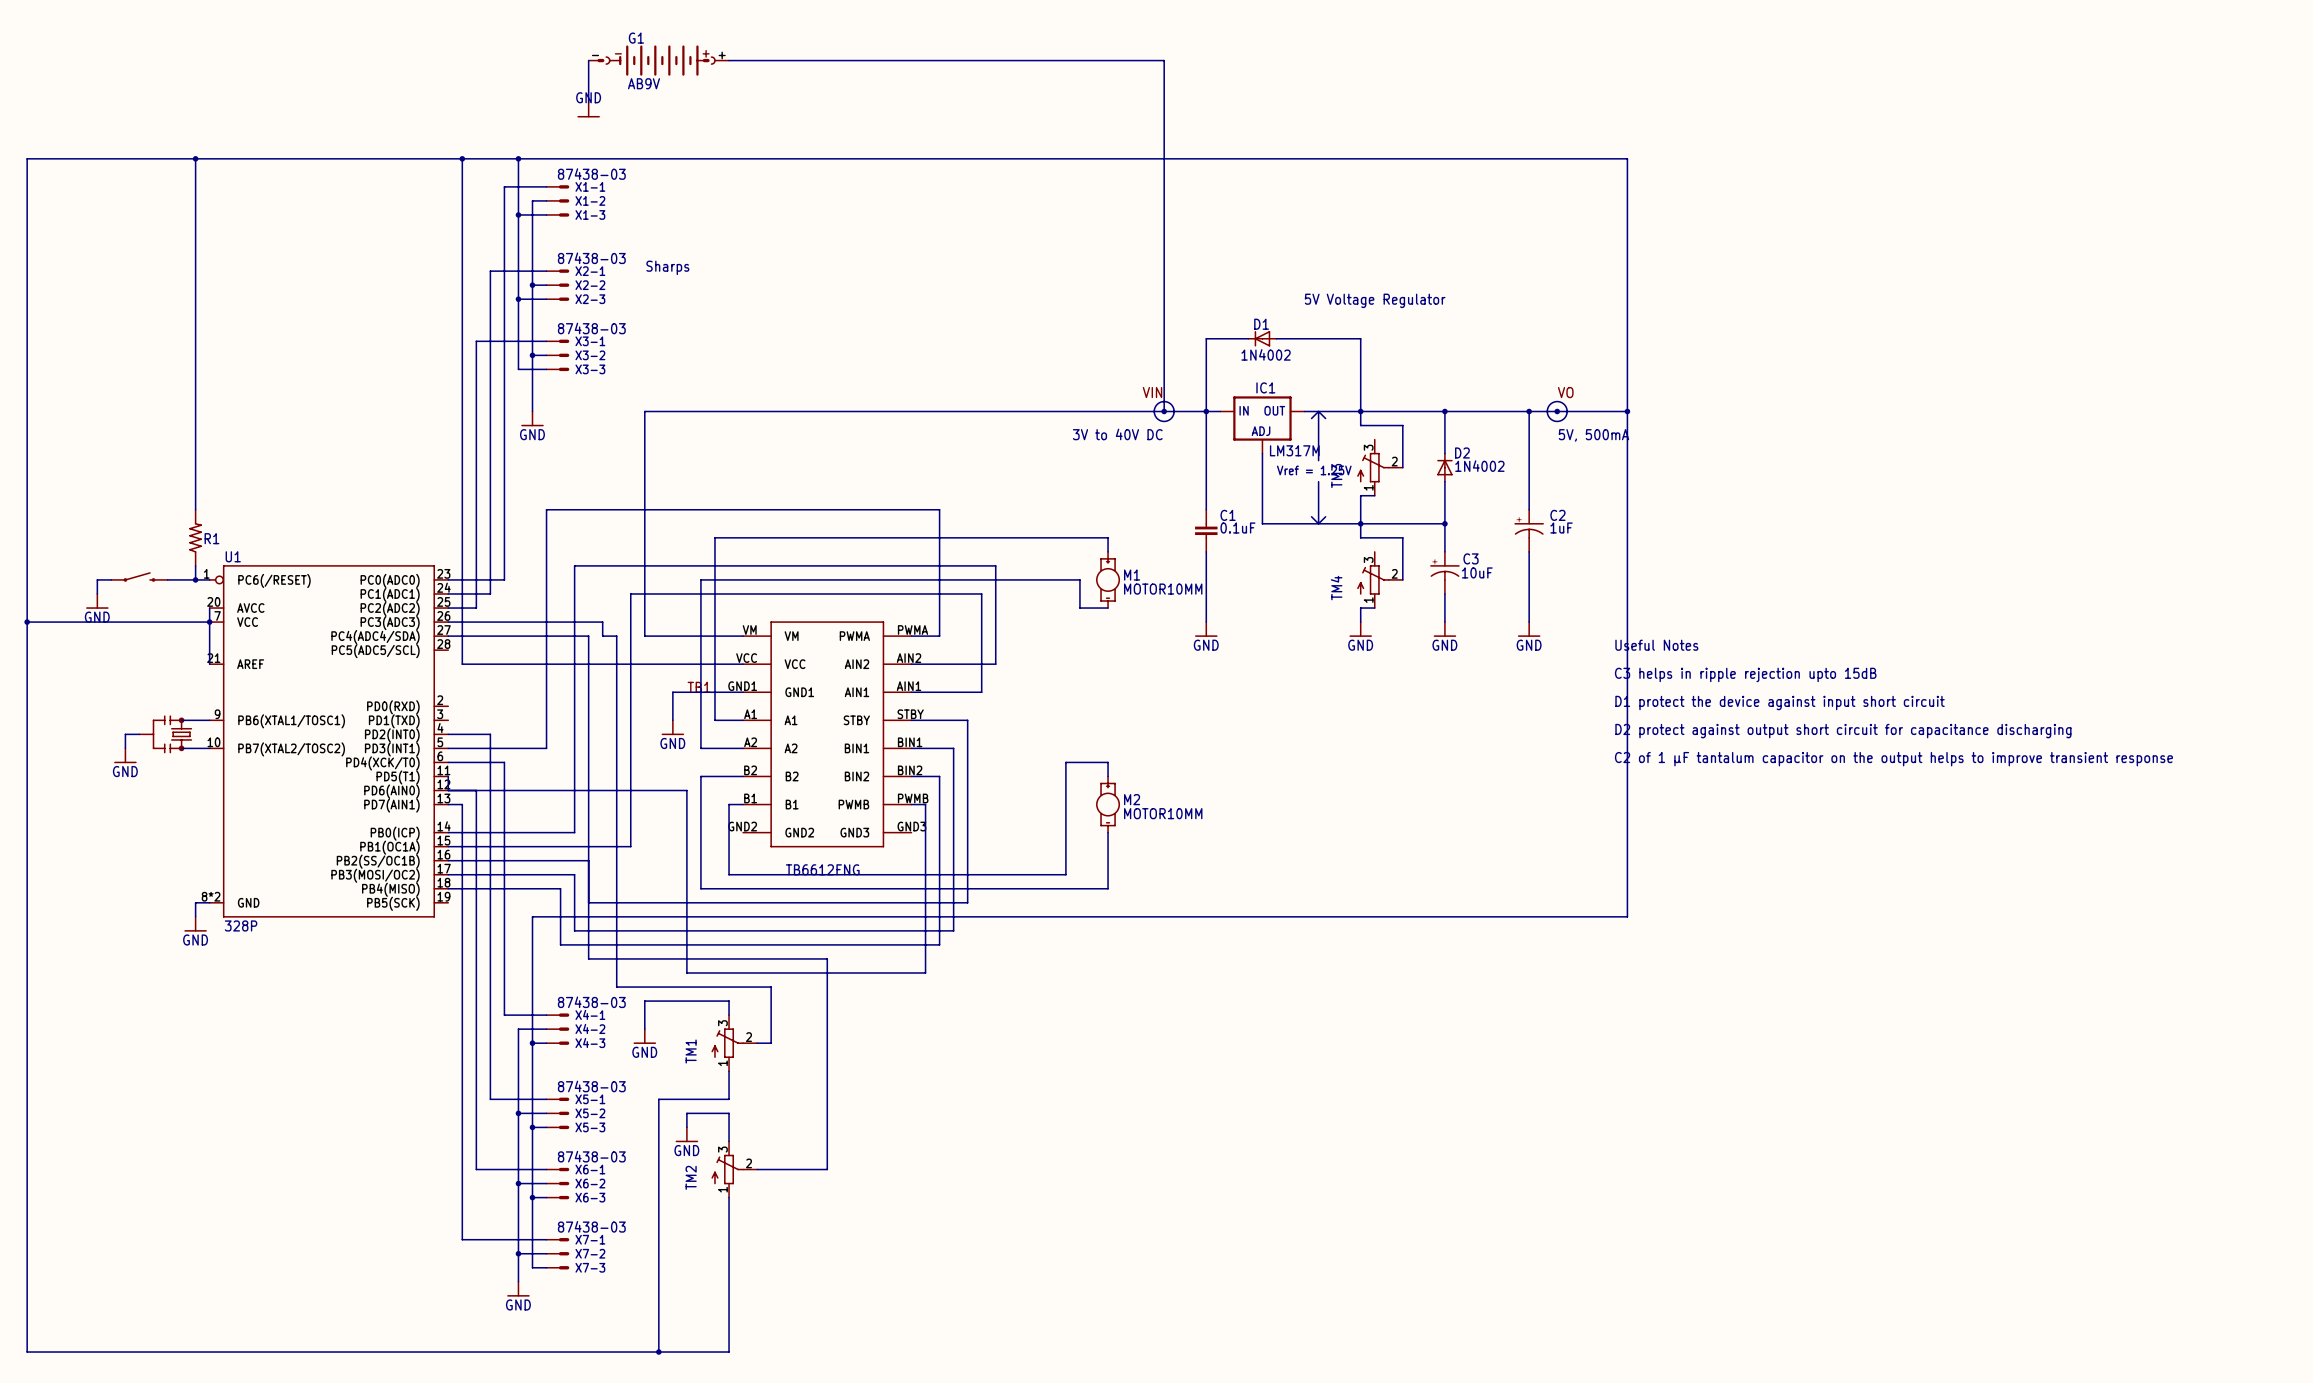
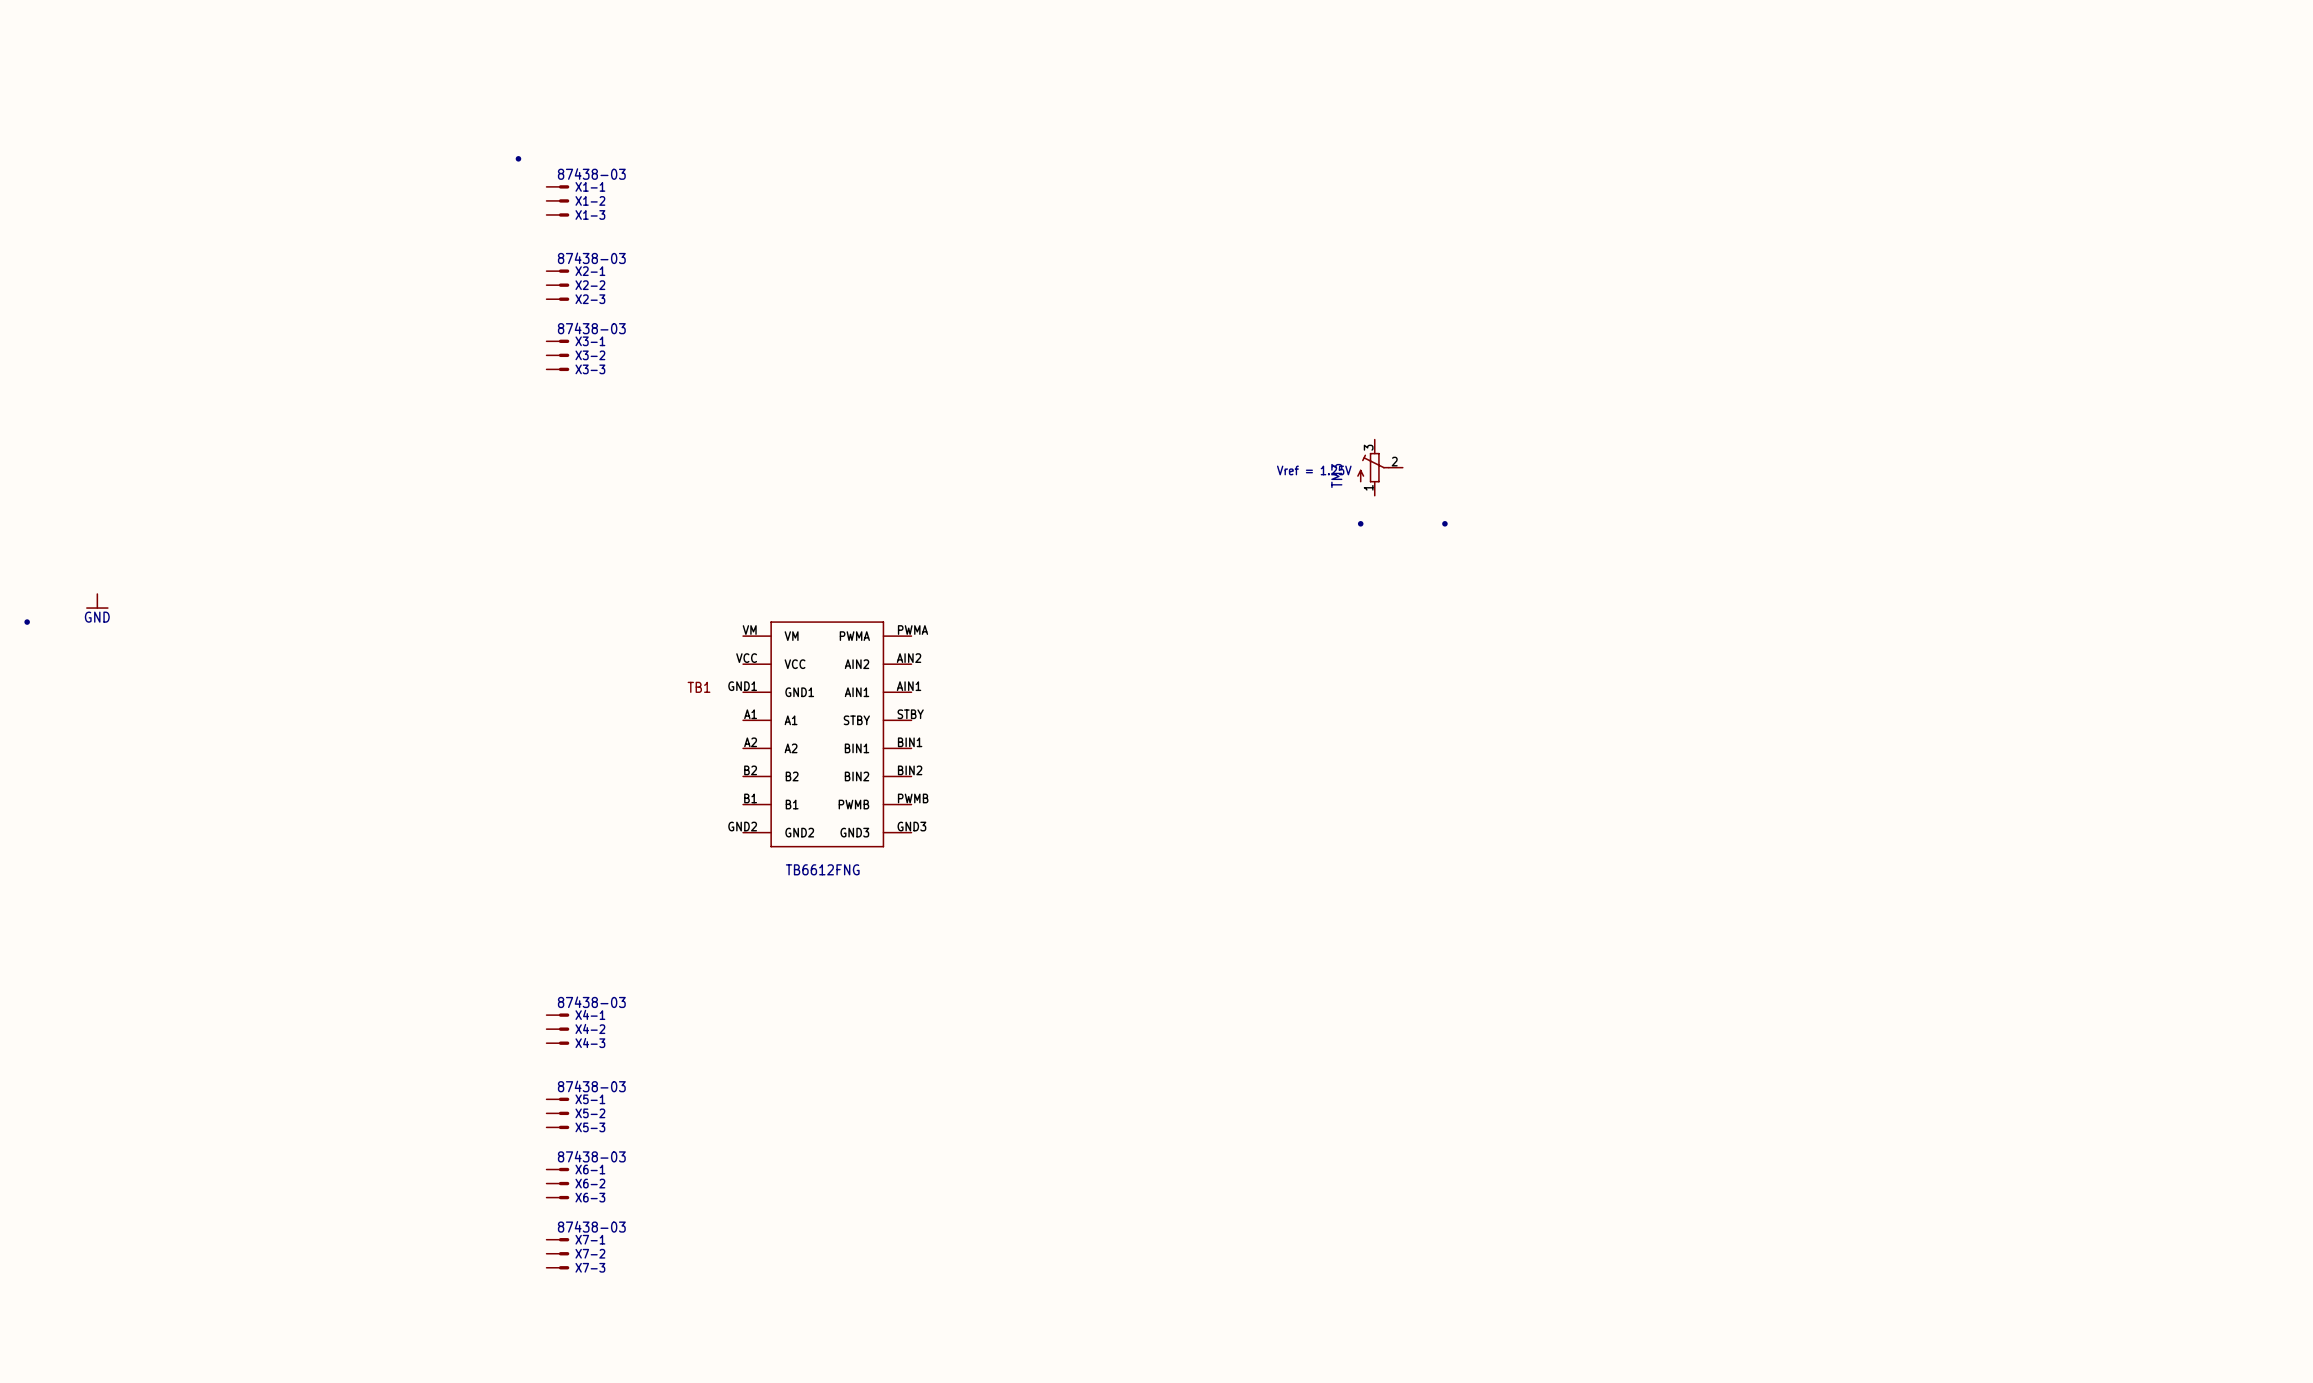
wire: (588, 60) (588, 102) -> none
G1: AB9V (658, 60) -> none
wire: (729, 60) (1164, 60) (1164, 411) -> none
power symbol: GND (588, 110) -> none
wire: (195, 158) (195, 509) -> none
junction: (195, 158) -> none
wire: (462, 158) (462, 664) (743, 664) -> none
junction: (462, 158) -> none
wire: (518, 158) (518, 369) (546, 369) -> none
wire: (546, 186) (504, 186) (504, 579) (448, 579) -> none
wire: (546, 200) (532, 200) (532, 411) -> none
wire: (518, 214) (546, 214) -> none
junction: (518, 214) -> none
text: Sharps (667, 267) -> none
wire: (546, 271) (490, 271) (490, 593) (448, 593) -> none
wire: (532, 285) (546, 285) -> none
junction: (532, 285) -> none
wire: (518, 299) (546, 299) -> none
junction: (518, 299) -> none
text: 5V Voltage Regulator (1375, 300) -> none
wire: (1248, 338) (1206, 338) (1206, 509) -> none
D1: 1N4002 (1262, 338) -> none
wire: (1276, 338) (1360, 338) (1360, 425) (1402, 425) (1402, 467) -> none
wire: (546, 341) (476, 341) (476, 608) (448, 608) -> none
wire: (532, 355) (546, 355) -> none
junction: (532, 355) -> none
label: VIN (1152, 392) -> none
label: VO (1565, 392) -> none
drawing: [1153, 401, 1175, 422] -> none
drawing: [1546, 401, 1568, 422] -> none
junction: (1164, 411) -> none
junction: (1206, 411) -> none
wire: (1220, 411) (644, 411) (644, 636) (743, 636) -> none
wire: (1304, 411) (1627, 411) -> none
line: (1318, 411) (1318, 460) -> none
line: (1318, 411) (1325, 418) -> none
line: (1318, 411) (1311, 418) -> none
junction: (1360, 411) -> none
wire: (1444, 411) (1444, 453) -> none
junction: (1444, 411) -> none
wire: (1529, 411) (1529, 509) -> none
junction: (1529, 411) -> none
junction: (1557, 411) -> none
junction: (1627, 411) -> none
power symbol: GND (532, 418) -> none
IC1: (1262, 424) -> none
text: 3V to 40V DC (1117, 434) -> none
text: 5V, 500mA (1593, 435) -> none
wire: (1262, 453) (1262, 523) (1444, 523) -> none
D2: 1N4002 (1444, 467) -> none
line: (1318, 481) (1318, 523) -> none
wire: (1444, 481) (1444, 551) -> none
wire: (1374, 495) (1360, 495) (1360, 537) (1402, 537) (1402, 579) -> none
line: (1311, 516) (1318, 523) -> none
line: (1325, 516) (1318, 523) -> none
C1: 0.1uF (1206, 530) -> none
C2: 1uF (1529, 530) -> none
R1: (195, 537) -> none
wire: (1108, 551) (1108, 537) (714, 537) (714, 720) (743, 720) -> none
wire: (1206, 551) (1206, 622) -> none
wire: (1529, 551) (1529, 622) -> none
wire: (195, 565) (195, 579) -> none
C3: 10uF (1444, 572) -> none
part: (139, 577) -> none
wire: (111, 579) (97, 579) (97, 593) -> none
wire: (167, 579) (209, 579) -> none
junction: (195, 579) -> none
M1: MOTOR10MM (1108, 579) -> none
TM4: (1380, 579) -> none
wire: (1444, 593) (1444, 622) -> none
wire: (209, 608) (209, 664) -> none
wire: (1108, 608) (1079, 608) (1079, 579) (700, 579) (700, 748) (743, 748) -> none
wire: (1374, 608) (1360, 608) (1360, 622) -> none
wire: (27, 622) (209, 622) -> none
junction: (209, 622) -> none
wire: (448, 622) (602, 622) (602, 636) (616, 636) (616, 987) (771, 987) (771, 1043) (757, 1043) -> none
power symbol: GND (1206, 629) -> none
power symbol: GND (1360, 629) -> none
power symbol: GND (1444, 629) -> none
power symbol: GND (1529, 629) -> none
wire: (448, 636) (588, 636) (588, 958) (827, 958) (827, 1169) (757, 1169) -> none
wire: (911, 636) (939, 636) (939, 509) (546, 509) (546, 748) (448, 748) -> none
text: Useful Notes (1656, 645) -> none
wire: (911, 664) (995, 664) (995, 565) (574, 565) (574, 832) (448, 832) -> none
text: C3 helps in ripple rejection upto 15dB (1745, 674) -> none
wire: (743, 692) (672, 692) (672, 720) -> none
wire: (911, 692) (981, 692) (981, 593) (630, 593) (630, 846) (448, 846) -> none
text: D1 protect the device against input short circuit (1780, 703) -> none
wire: (181, 720) (209, 720) -> none
wire: (911, 720) (967, 720) (967, 902) (588, 902) -> none
power symbol: GND (672, 727) -> none
text: D2 protect against output short circuit for capacitance discharging (1843, 731) -> none
wire: (139, 734) (125, 734) (125, 748) -> none
part: (165, 734) -> none
wire: (448, 734) (490, 734) (490, 1099) (546, 1099) -> none
U1: 328P (328, 741) -> none
wire: (181, 748) (209, 748) -> none
wire: (911, 748) (953, 748) (953, 930) (574, 930) (574, 874) (448, 874) -> none
power symbol: GND (125, 755) -> none
text: C2 of 1 µF tantalum capacitor on the output helps to improve transient response (1893, 759) -> none
wire: (448, 762) (504, 762) (504, 1015) (546, 1015) -> none
wire: (448, 776) (448, 790) (686, 790) (686, 973) (925, 973) (925, 804) (911, 804) -> none
wire: (743, 776) (700, 776) (700, 888) (1108, 888) (1108, 832) -> none
wire: (911, 776) (939, 776) (939, 944) (560, 944) (560, 888) (448, 888) -> none
wire: (1108, 776) (1108, 762) (1065, 762) (1065, 874) (729, 874) (729, 804) (743, 804) -> none
wire: (476, 790) (476, 1169) (546, 1169) -> none
wire: (448, 804) (462, 804) (462, 1239) (546, 1239) -> none
M2: MOTOR10MM (1108, 804) -> none
wire: (448, 860) (588, 860) -> none
wire: (209, 902) (195, 902) (195, 916) -> none
power symbol: GND (195, 924) -> none
wire: (729, 1015) (729, 1001) (644, 1001) (644, 1029) -> none
wire: (546, 1029) (518, 1029) (518, 1281) -> none
power symbol: GND (644, 1036) -> none
wire: (532, 1043) (546, 1043) -> none
junction: (532, 1043) -> none
TM1: (734, 1043) -> none
wire: (729, 1071) (729, 1099) (658, 1099) (658, 1352) -> none
wire: (518, 1113) (546, 1113) -> none
junction: (518, 1113) -> none
wire: (532, 1127) (546, 1127) -> none
junction: (532, 1127) -> none
wire: (686, 1127) (686, 1113) (729, 1113) (729, 1141) -> none
power symbol: GND (686, 1134) -> none
TM2: (734, 1169) -> none
wire: (518, 1183) (546, 1183) -> none
junction: (518, 1183) -> none
wire: (532, 1197) (546, 1197) -> none
junction: (532, 1197) -> none
wire: (729, 1197) (729, 1352) (27, 1352) (27, 158) (1627, 158) (1627, 916) (532, 916) (532, 1267) (546, 1267) -> none
wire: (518, 1253) (546, 1253) -> none
junction: (518, 1253) -> none
power symbol: GND (518, 1289) -> none
junction: (658, 1352) -> none

